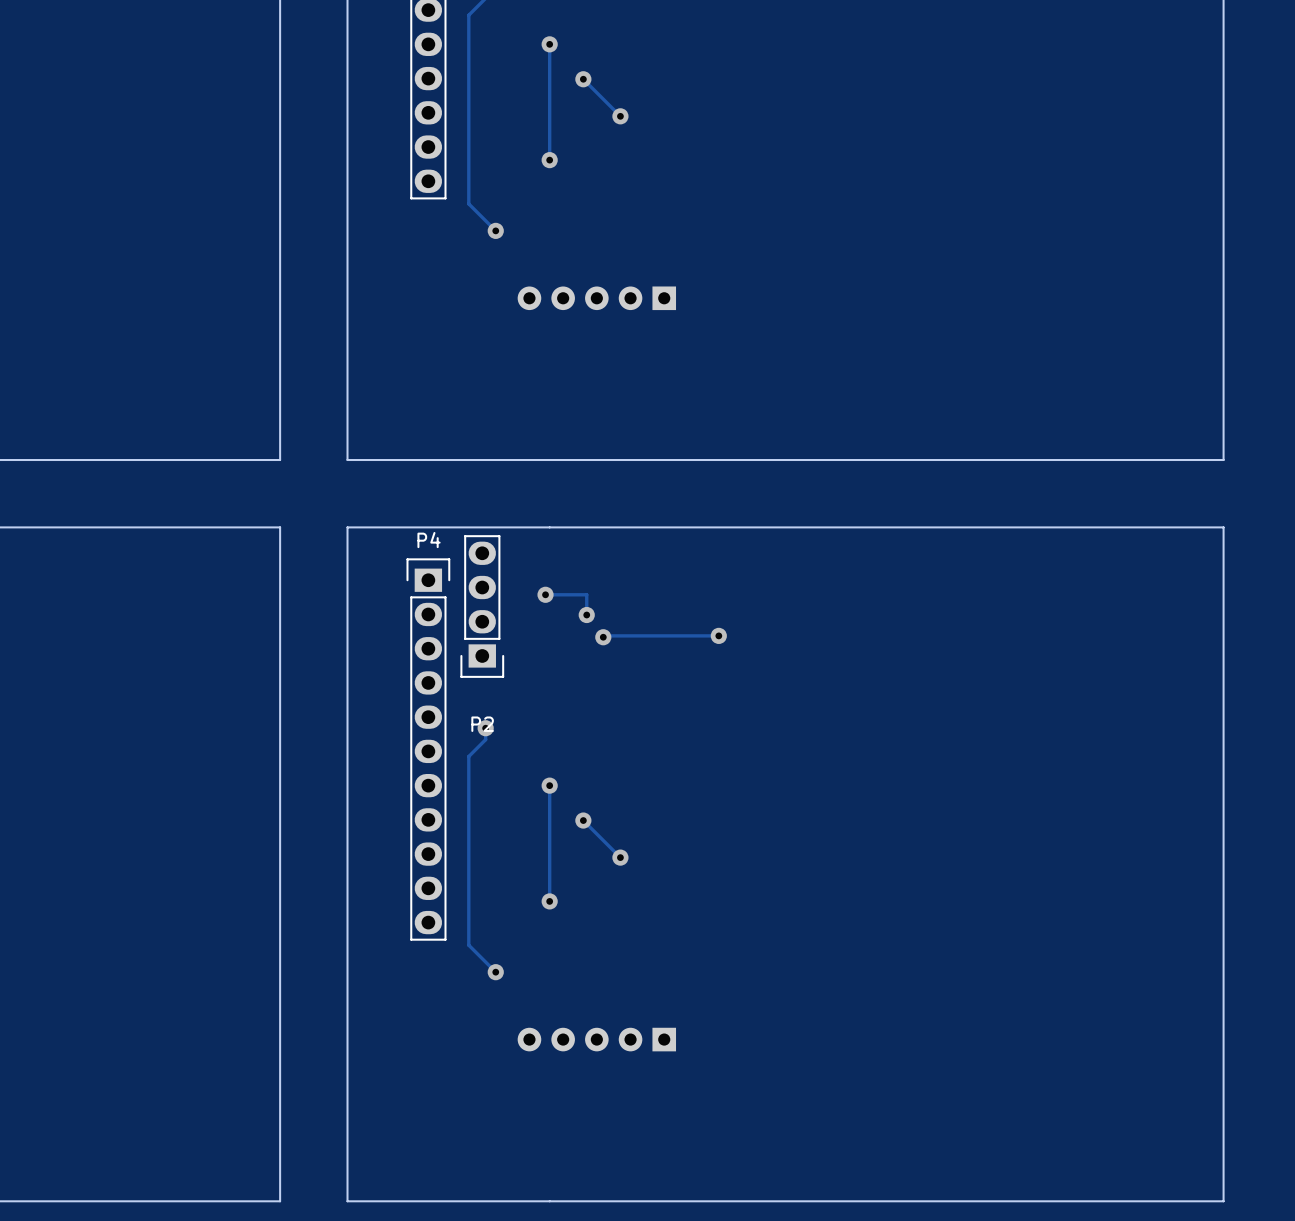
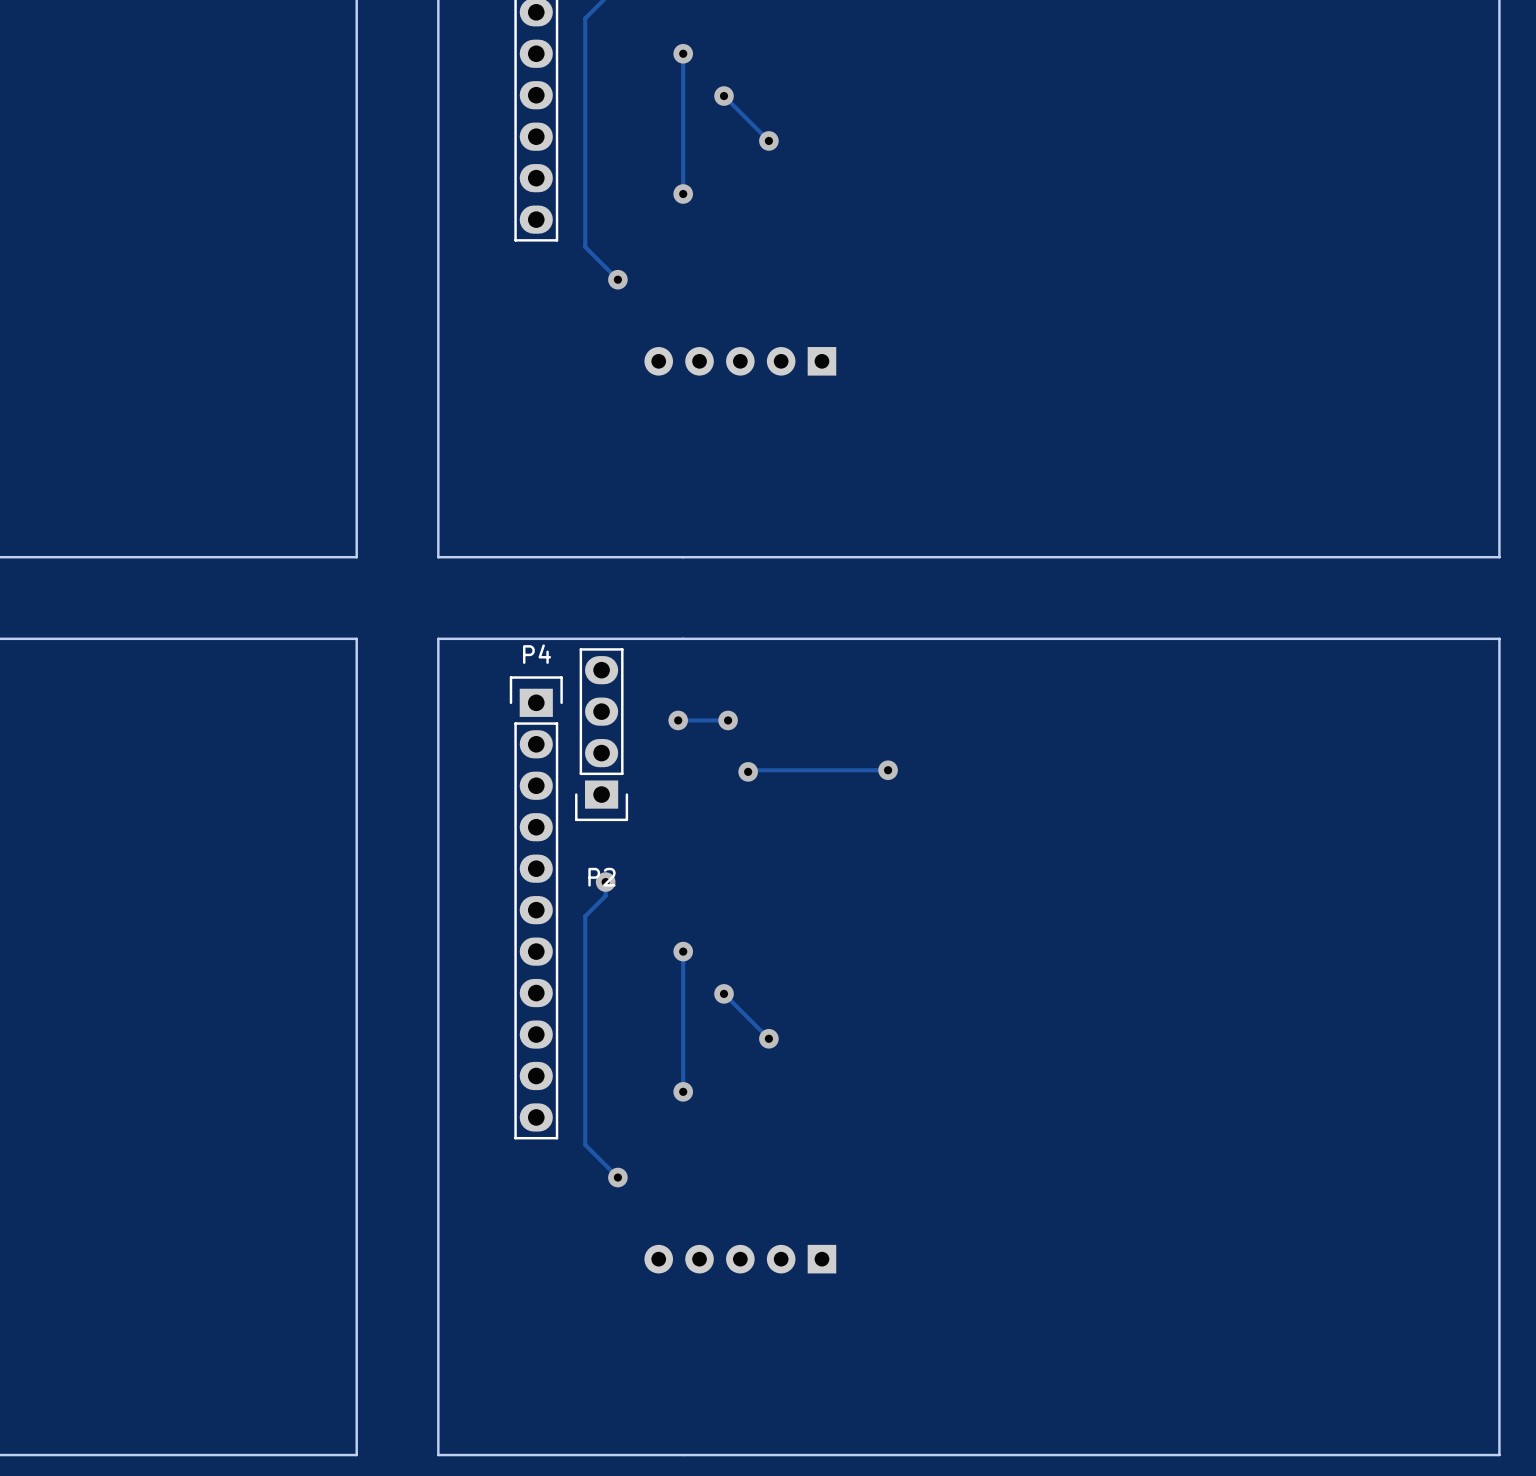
track: (586, 594) (586, 615) -> none
via position: (586, 615) -> (728, 720)

